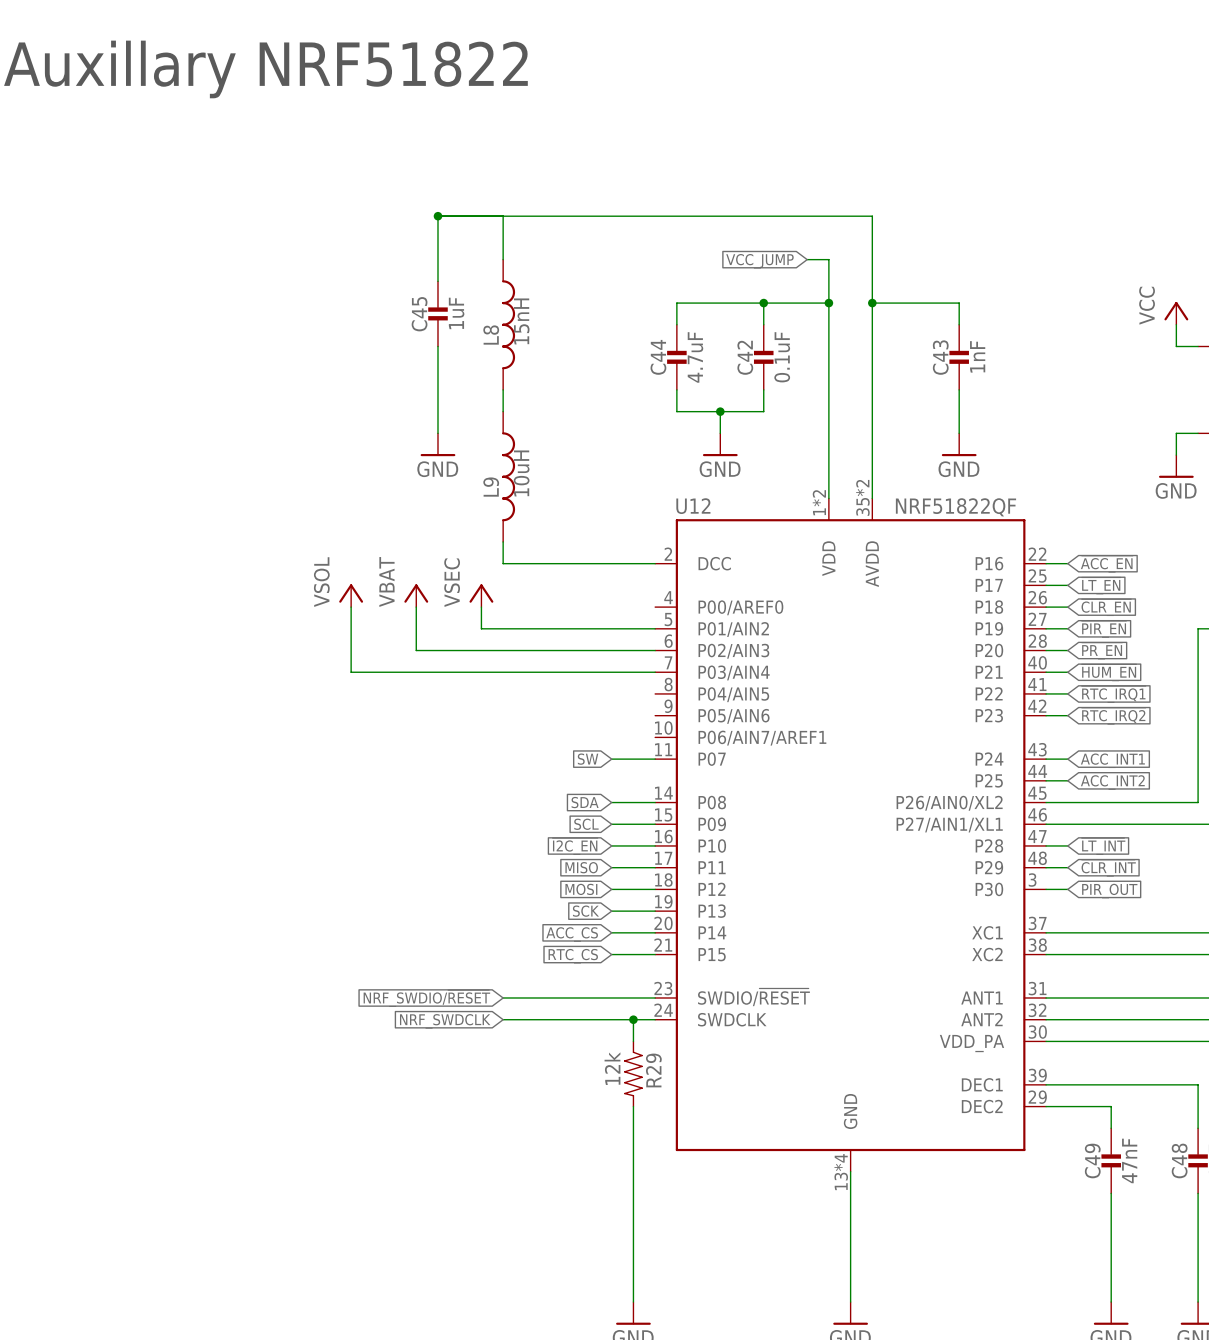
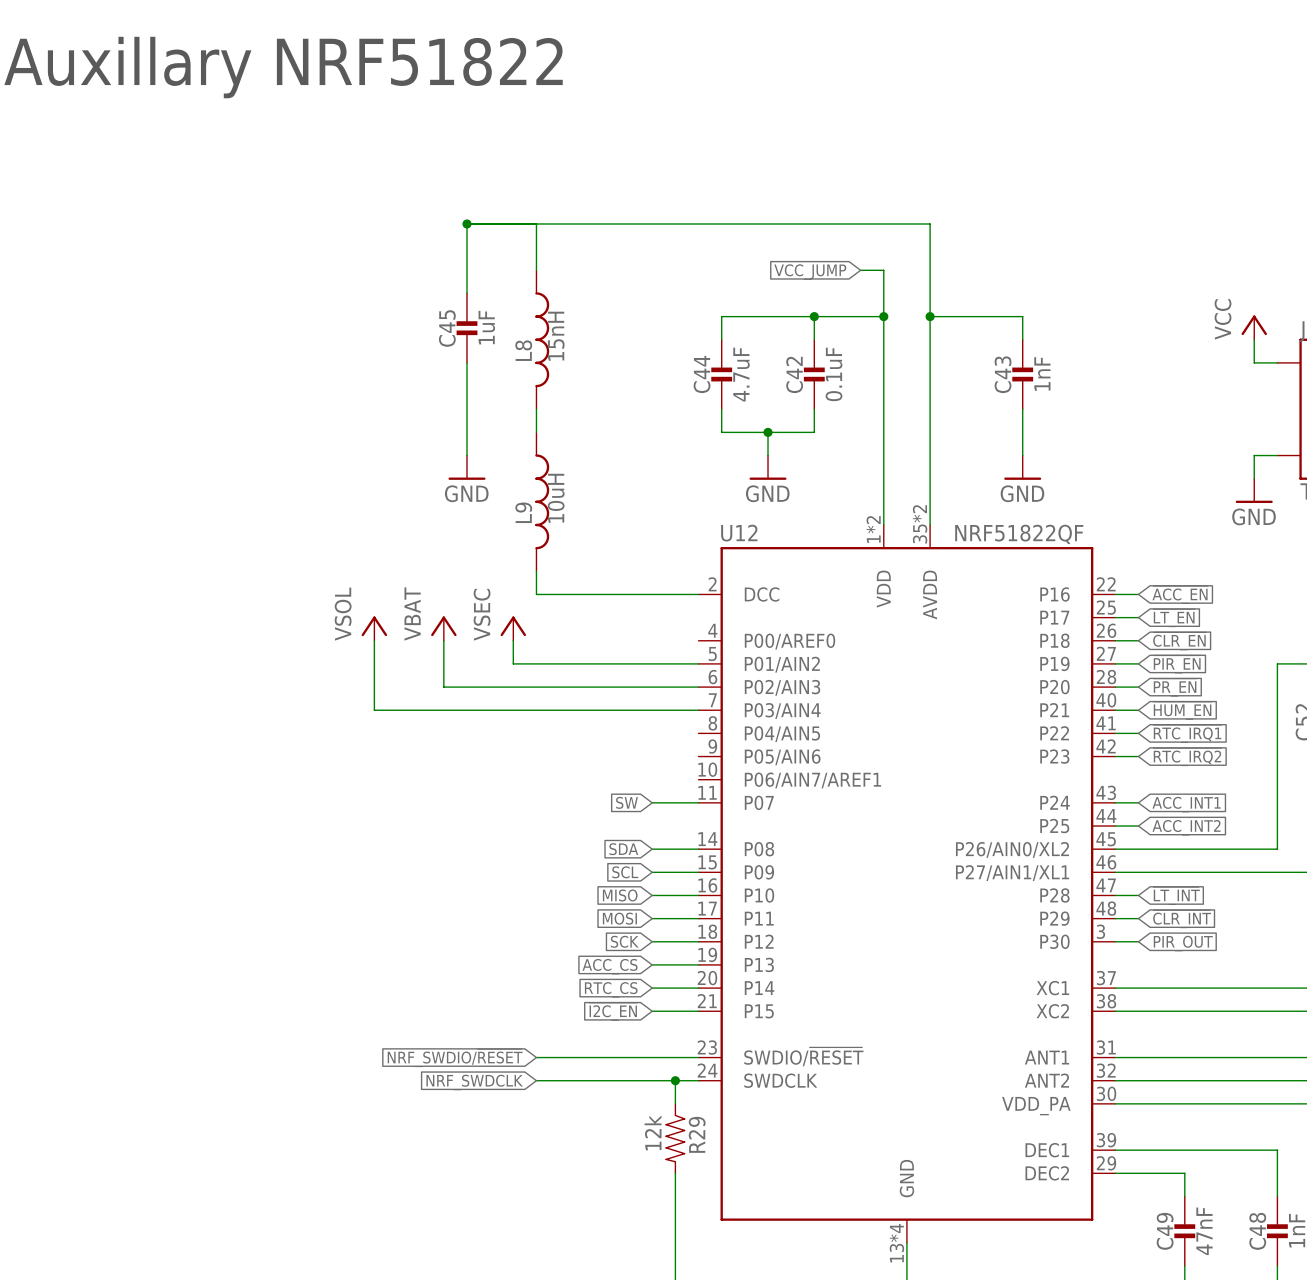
global label: ~{I2C_EN} (575, 846) -> MISO (620, 895)
global label: MISO (581, 867) -> MOSI (619, 918)
global label: MOSI (581, 889) -> SCK (624, 941)
global label: SCK (585, 911) -> ACC_CS (610, 966)
global label: ACC_CS (572, 934) -> RTC_CS (611, 989)
global label: RTC_CS (573, 956) -> ~{I2C_EN} (613, 1011)

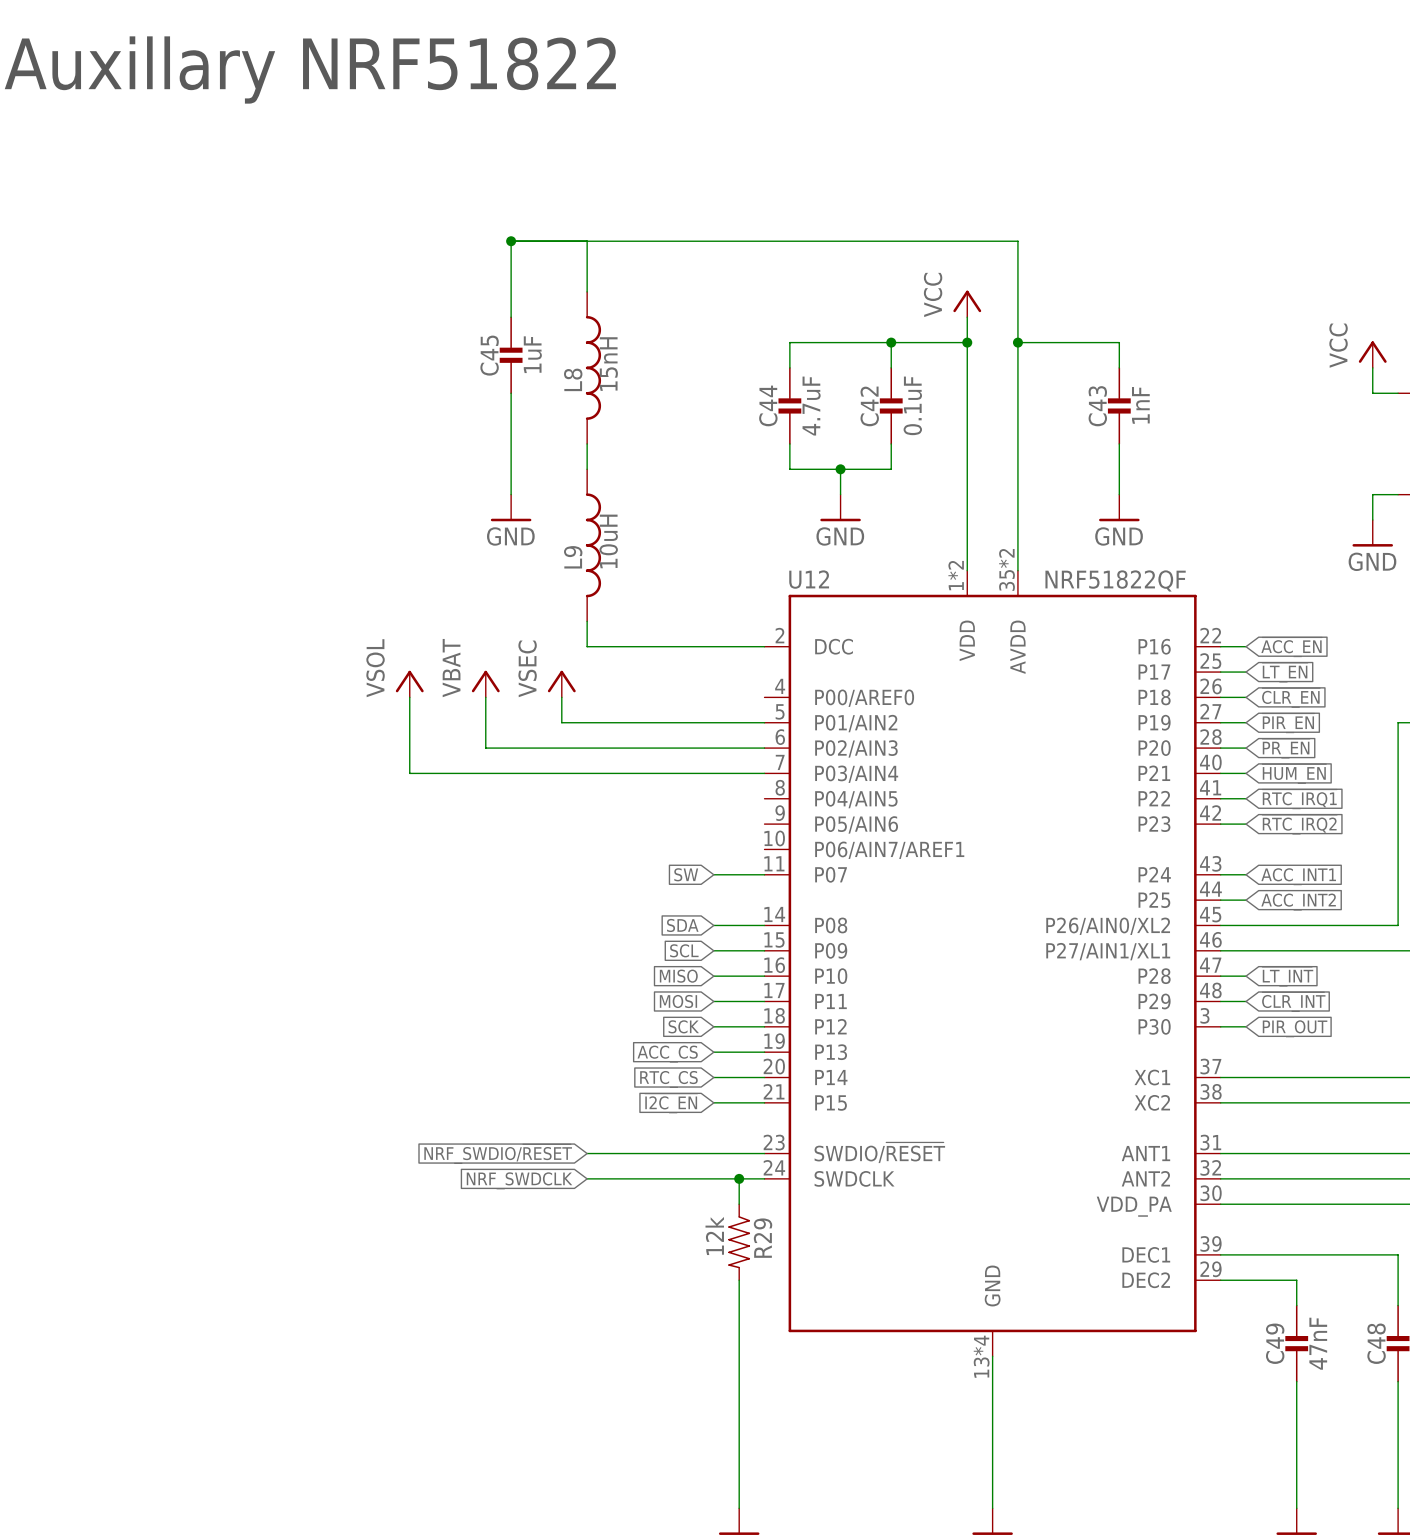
wire: (860, 270) (883, 270) (883, 293) -> none
global label: VCC_JUMP (810, 272) -> none
power symbol: none -> VCC (967, 303)

